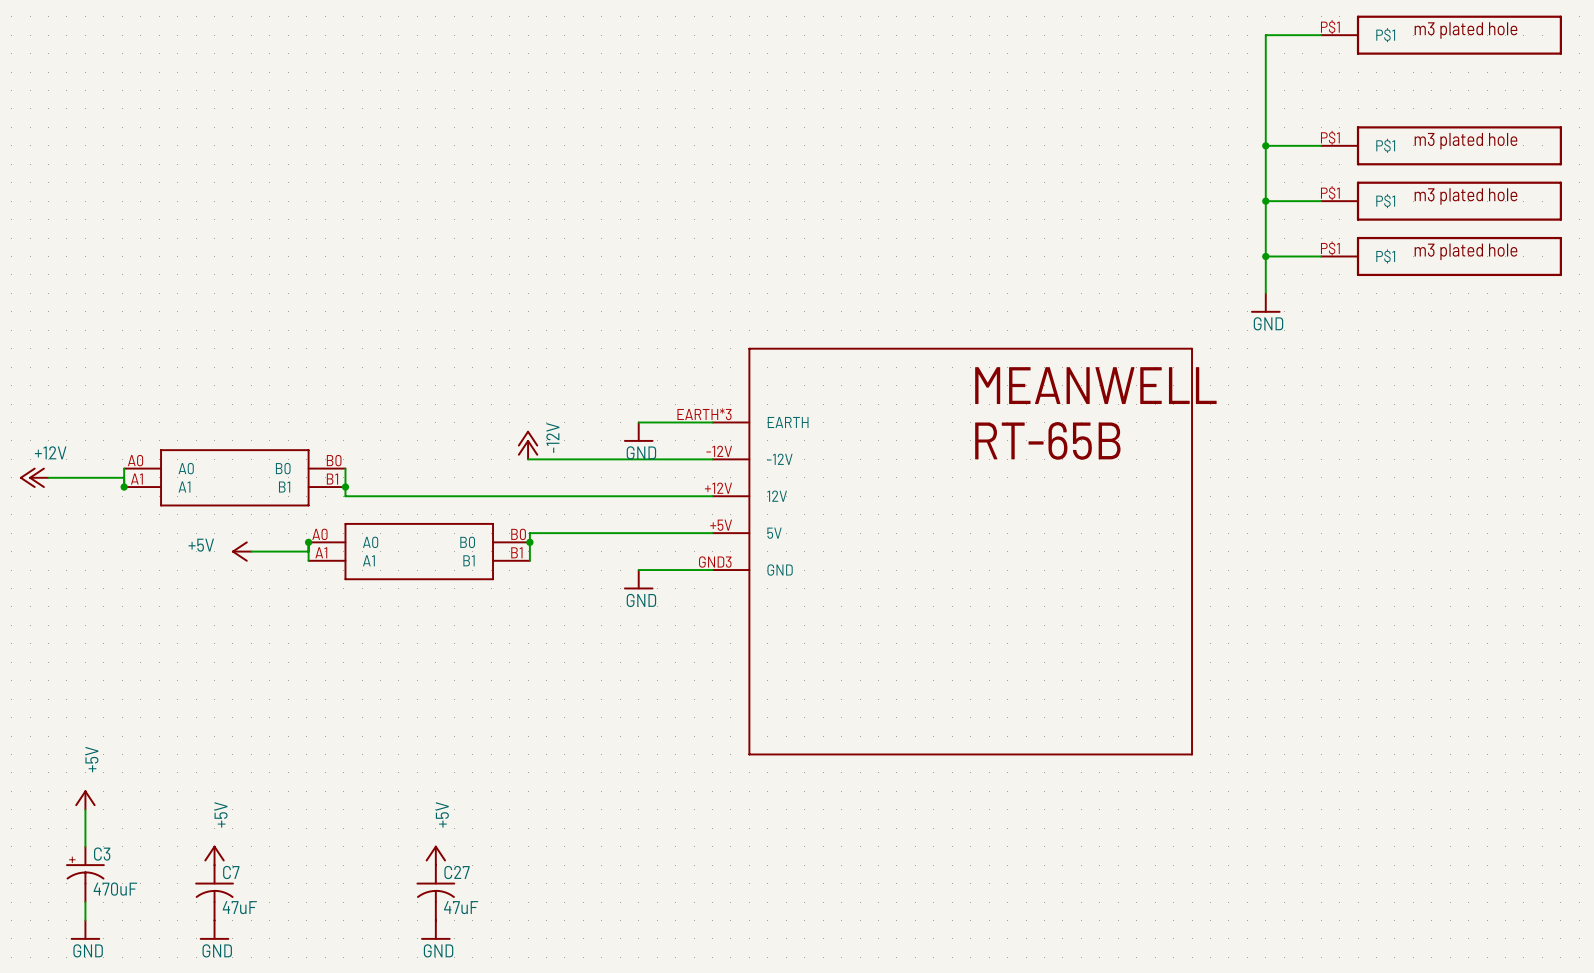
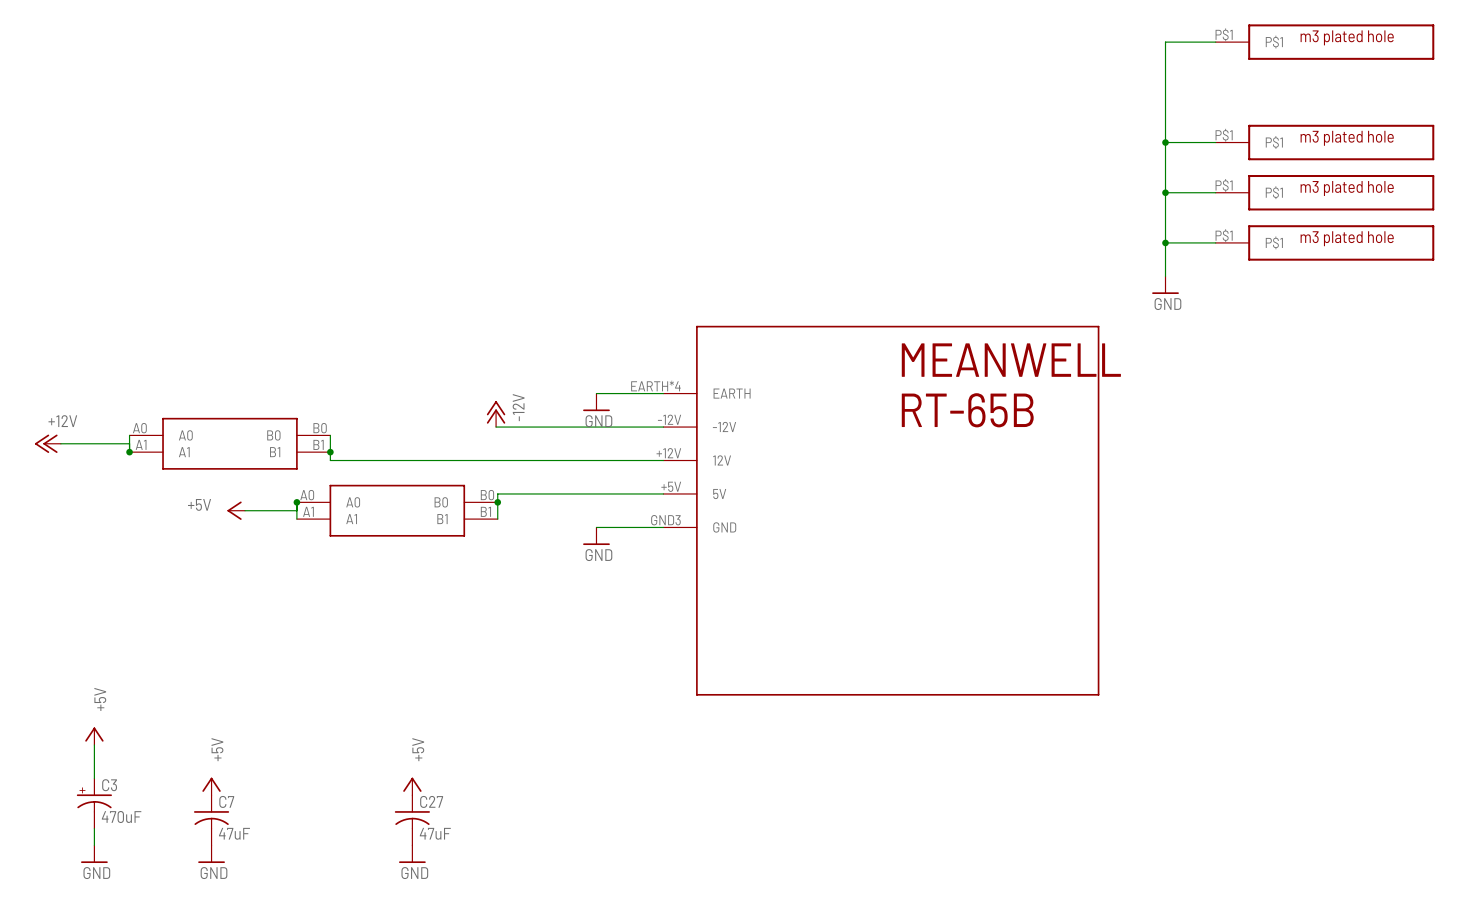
part pin number: EARTH*3 (704, 414) -> EARTH*4 (655, 385)

